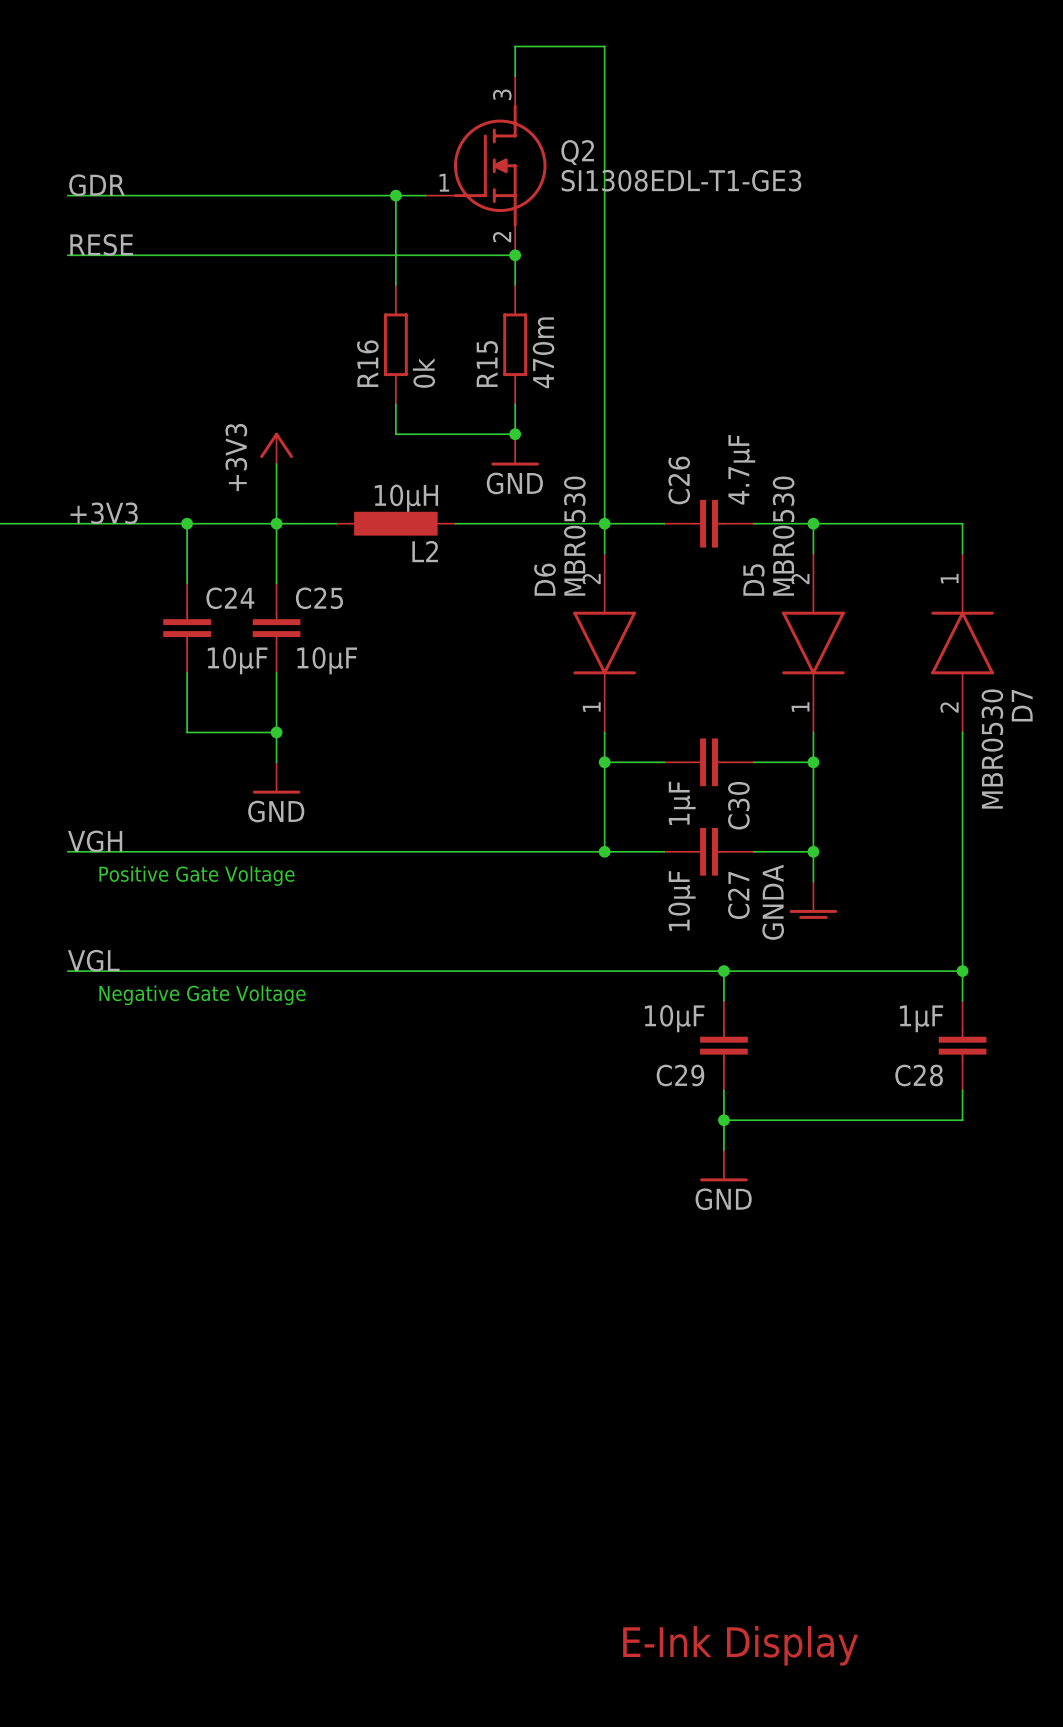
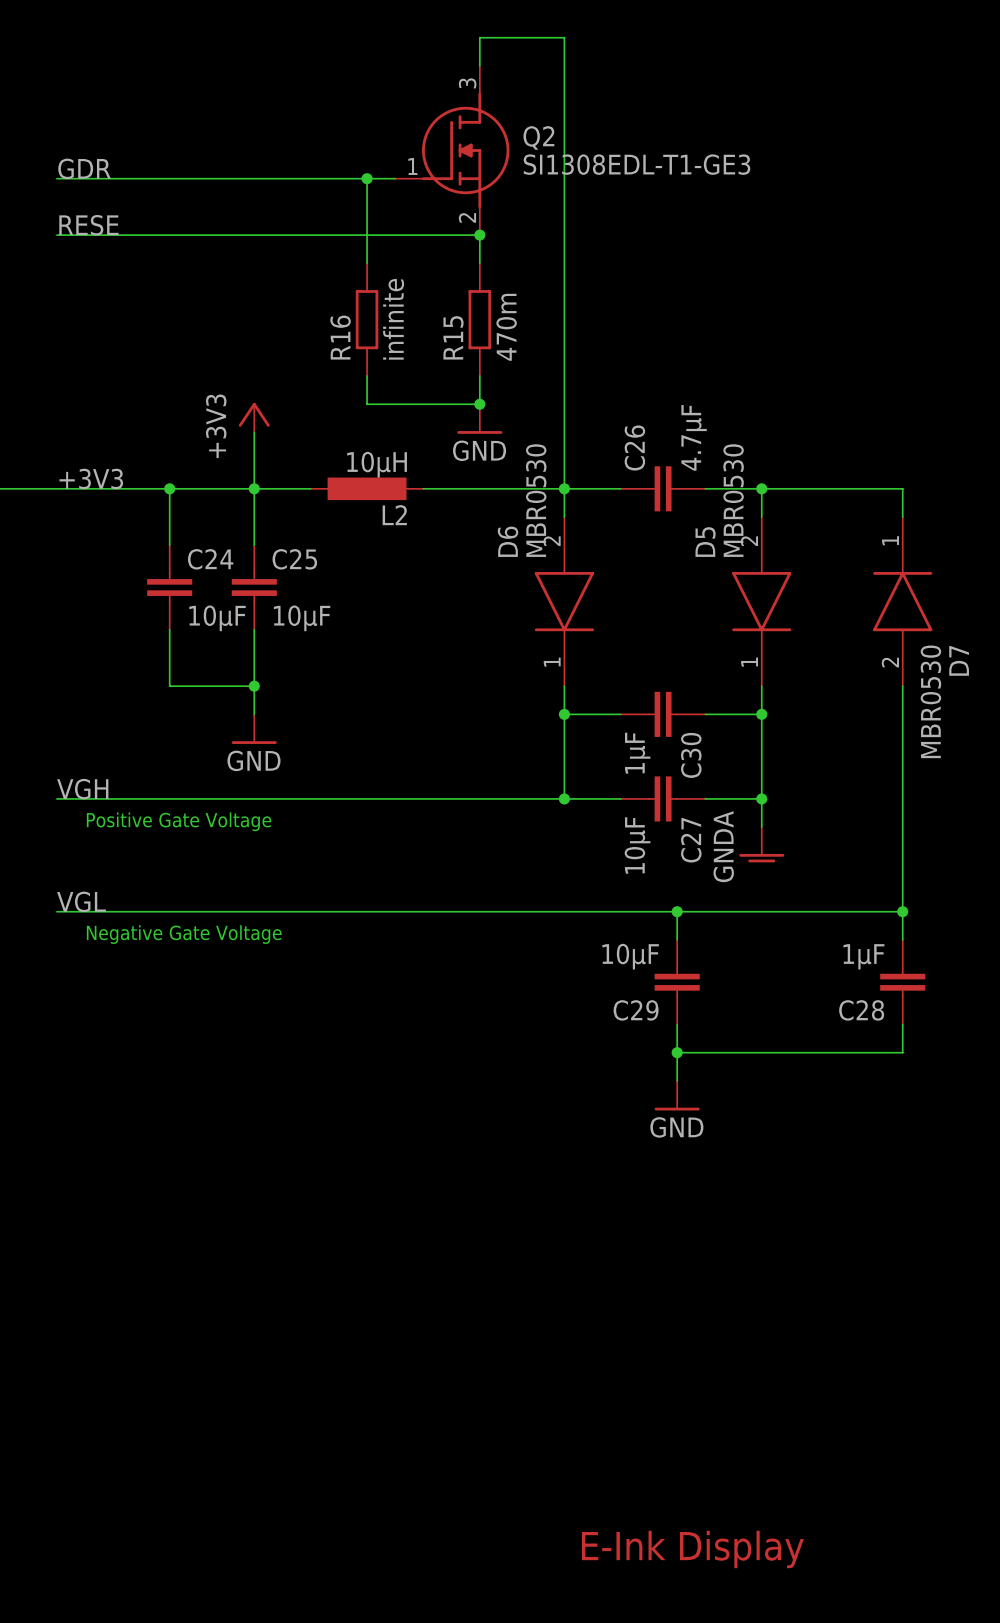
R16 value: 0k (423, 373) -> infinite (393, 319)

